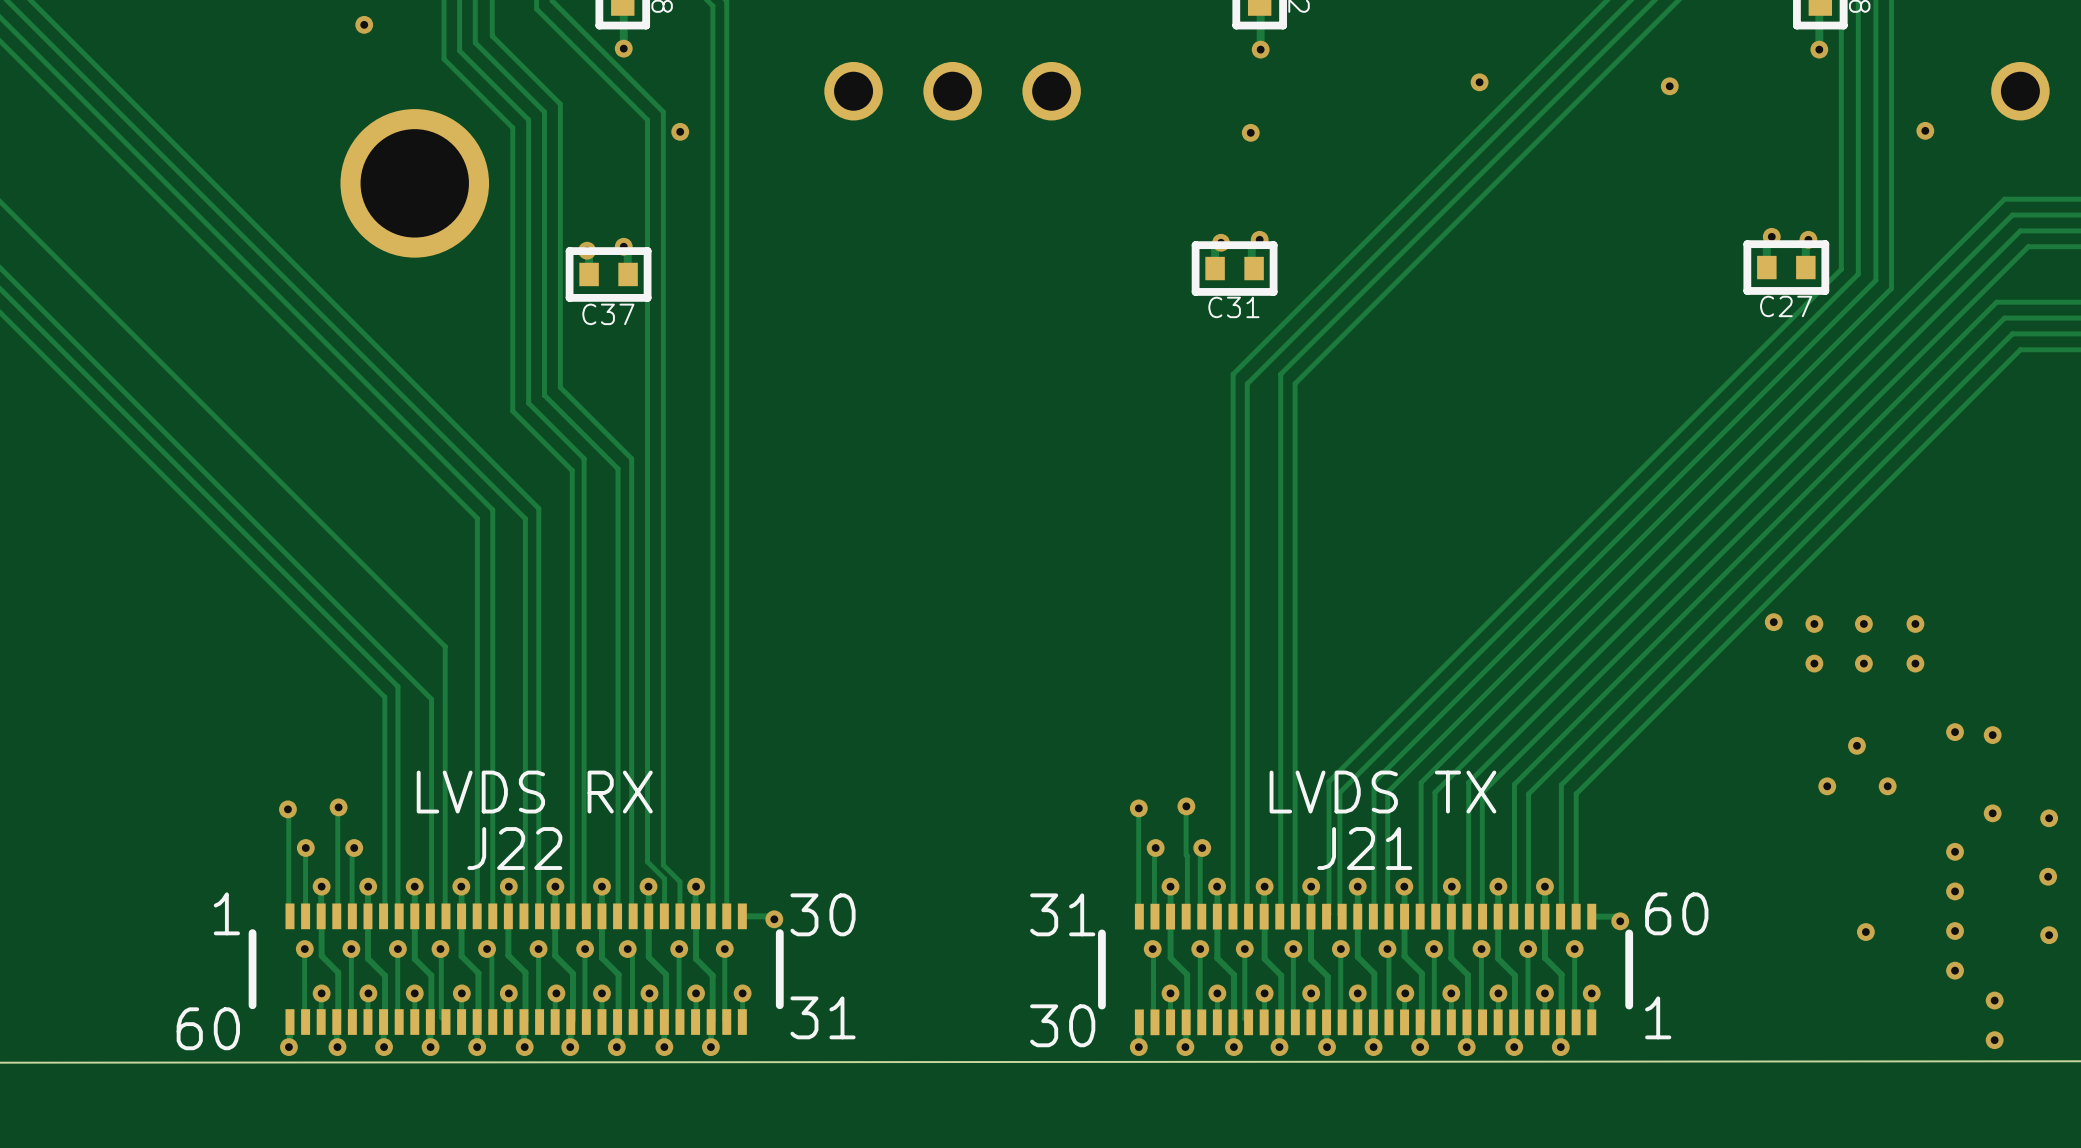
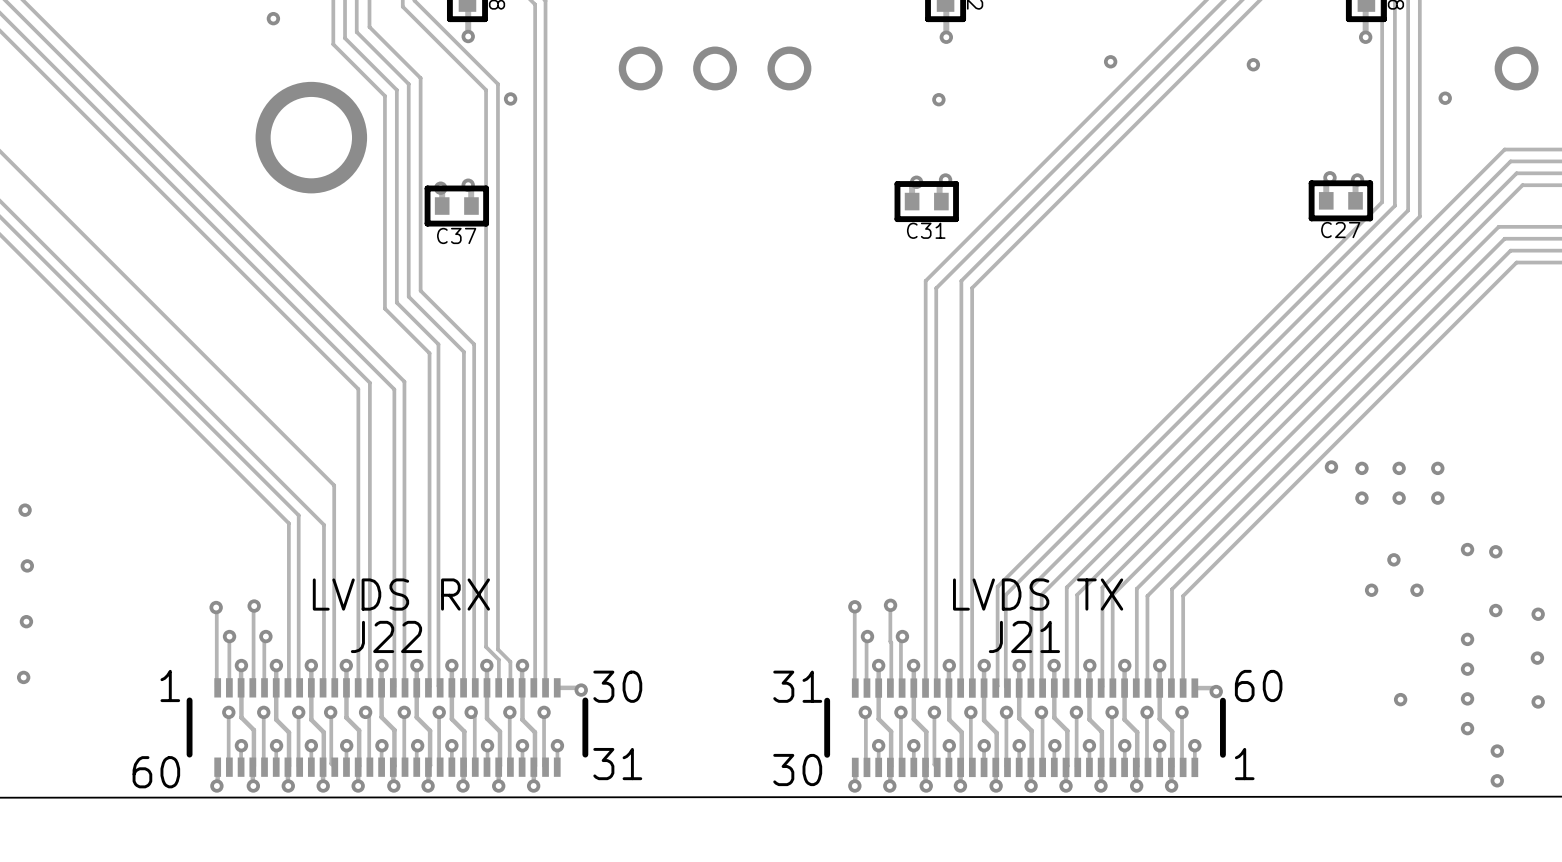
via: none -> (25, 510)
via: none -> (27, 565)
via: none -> (26, 621)
via: none -> (23, 677)

